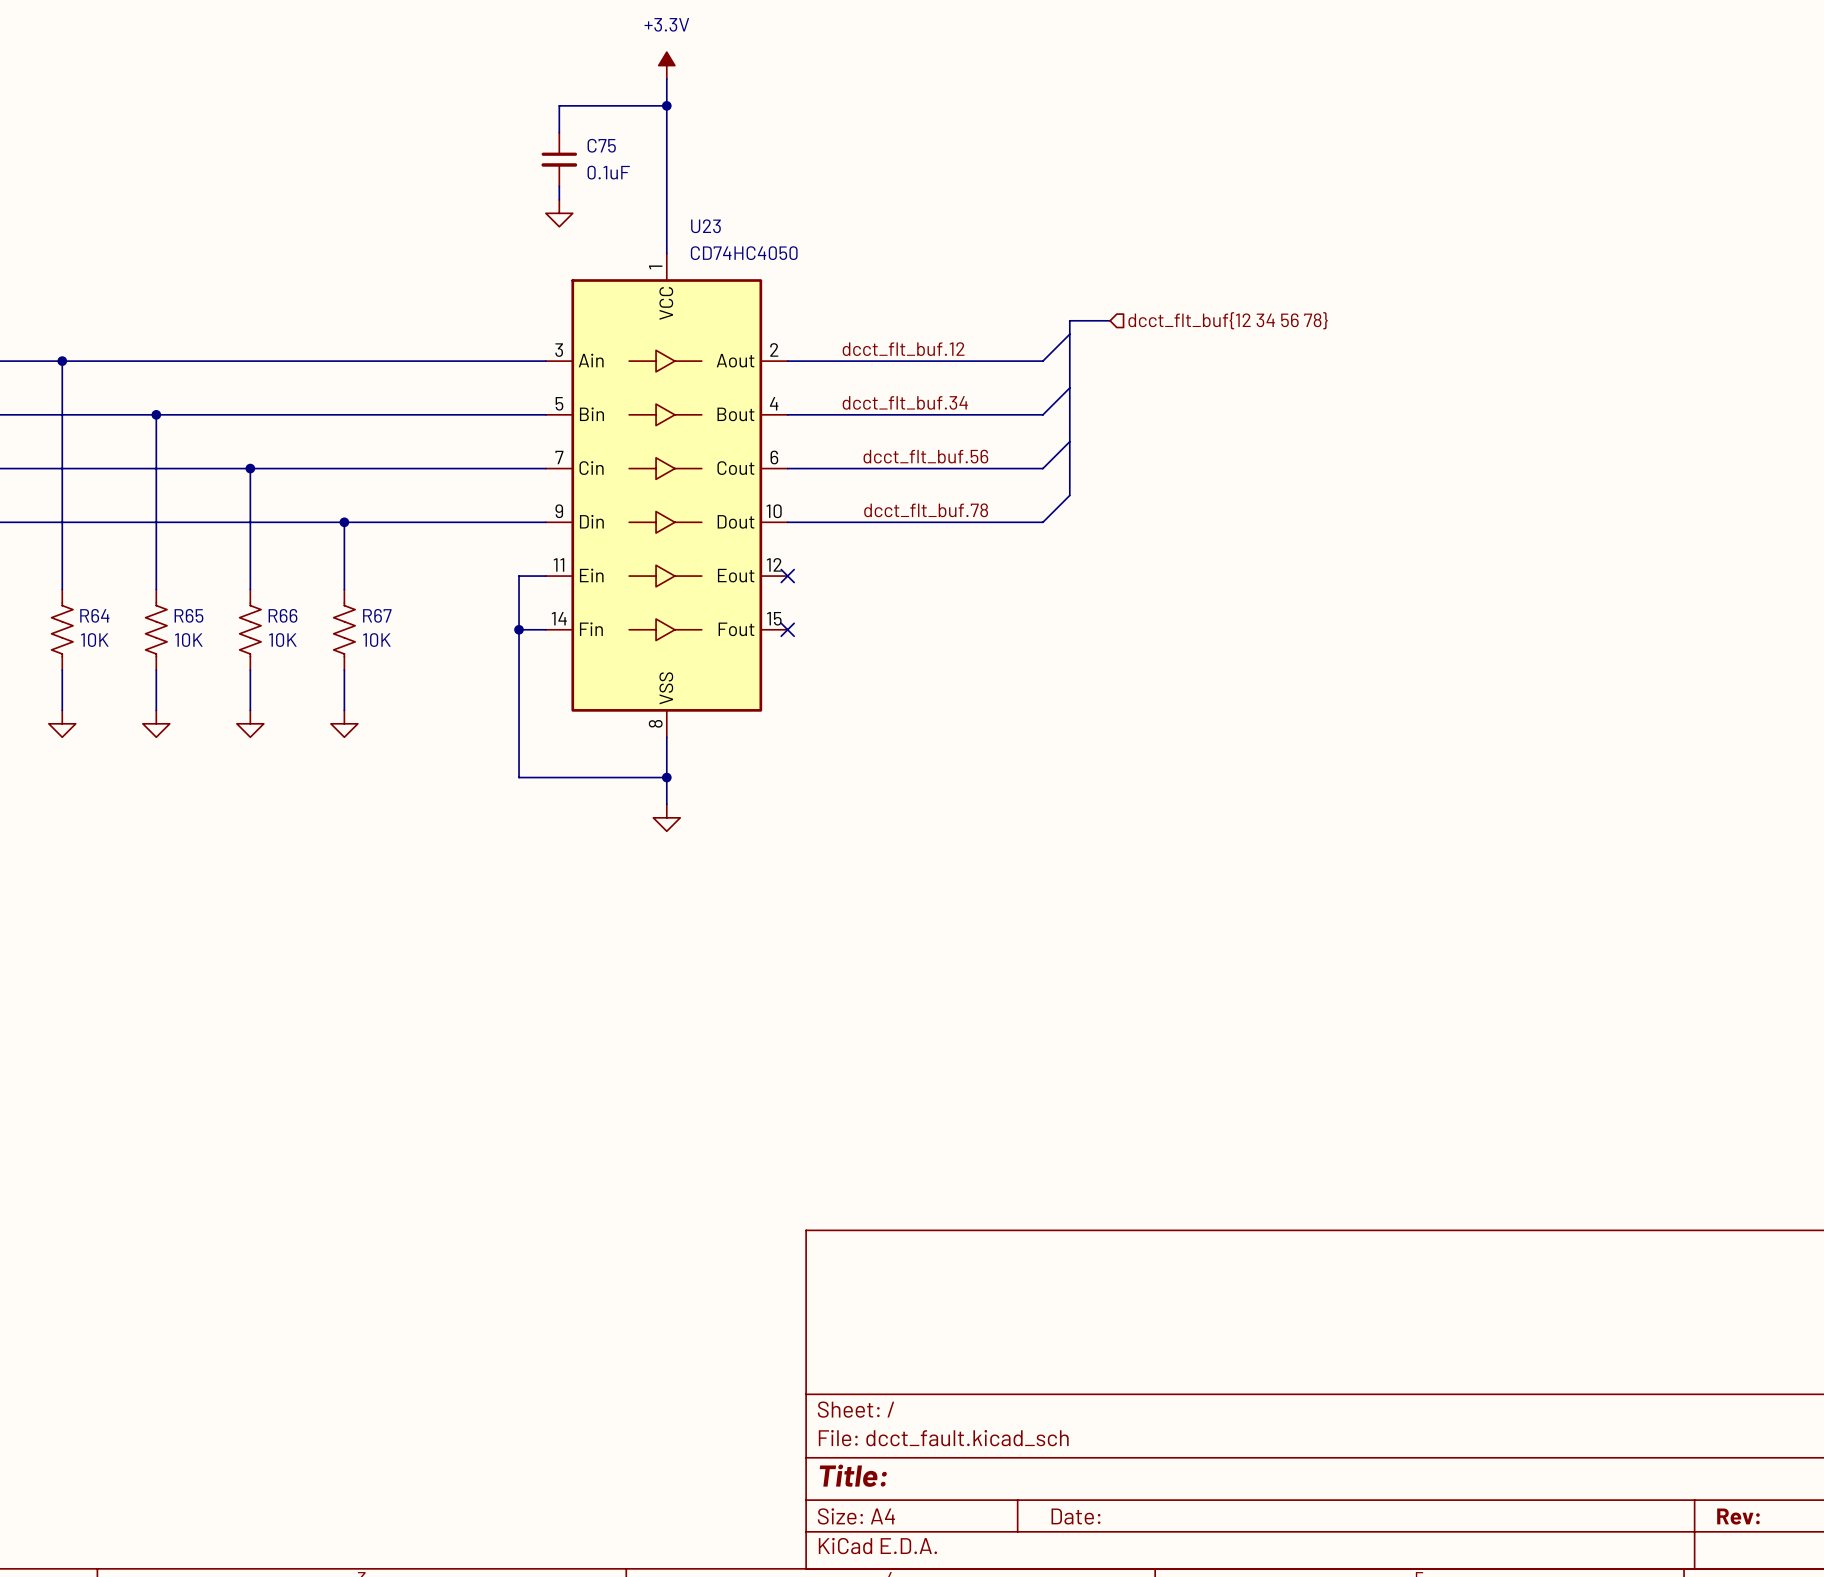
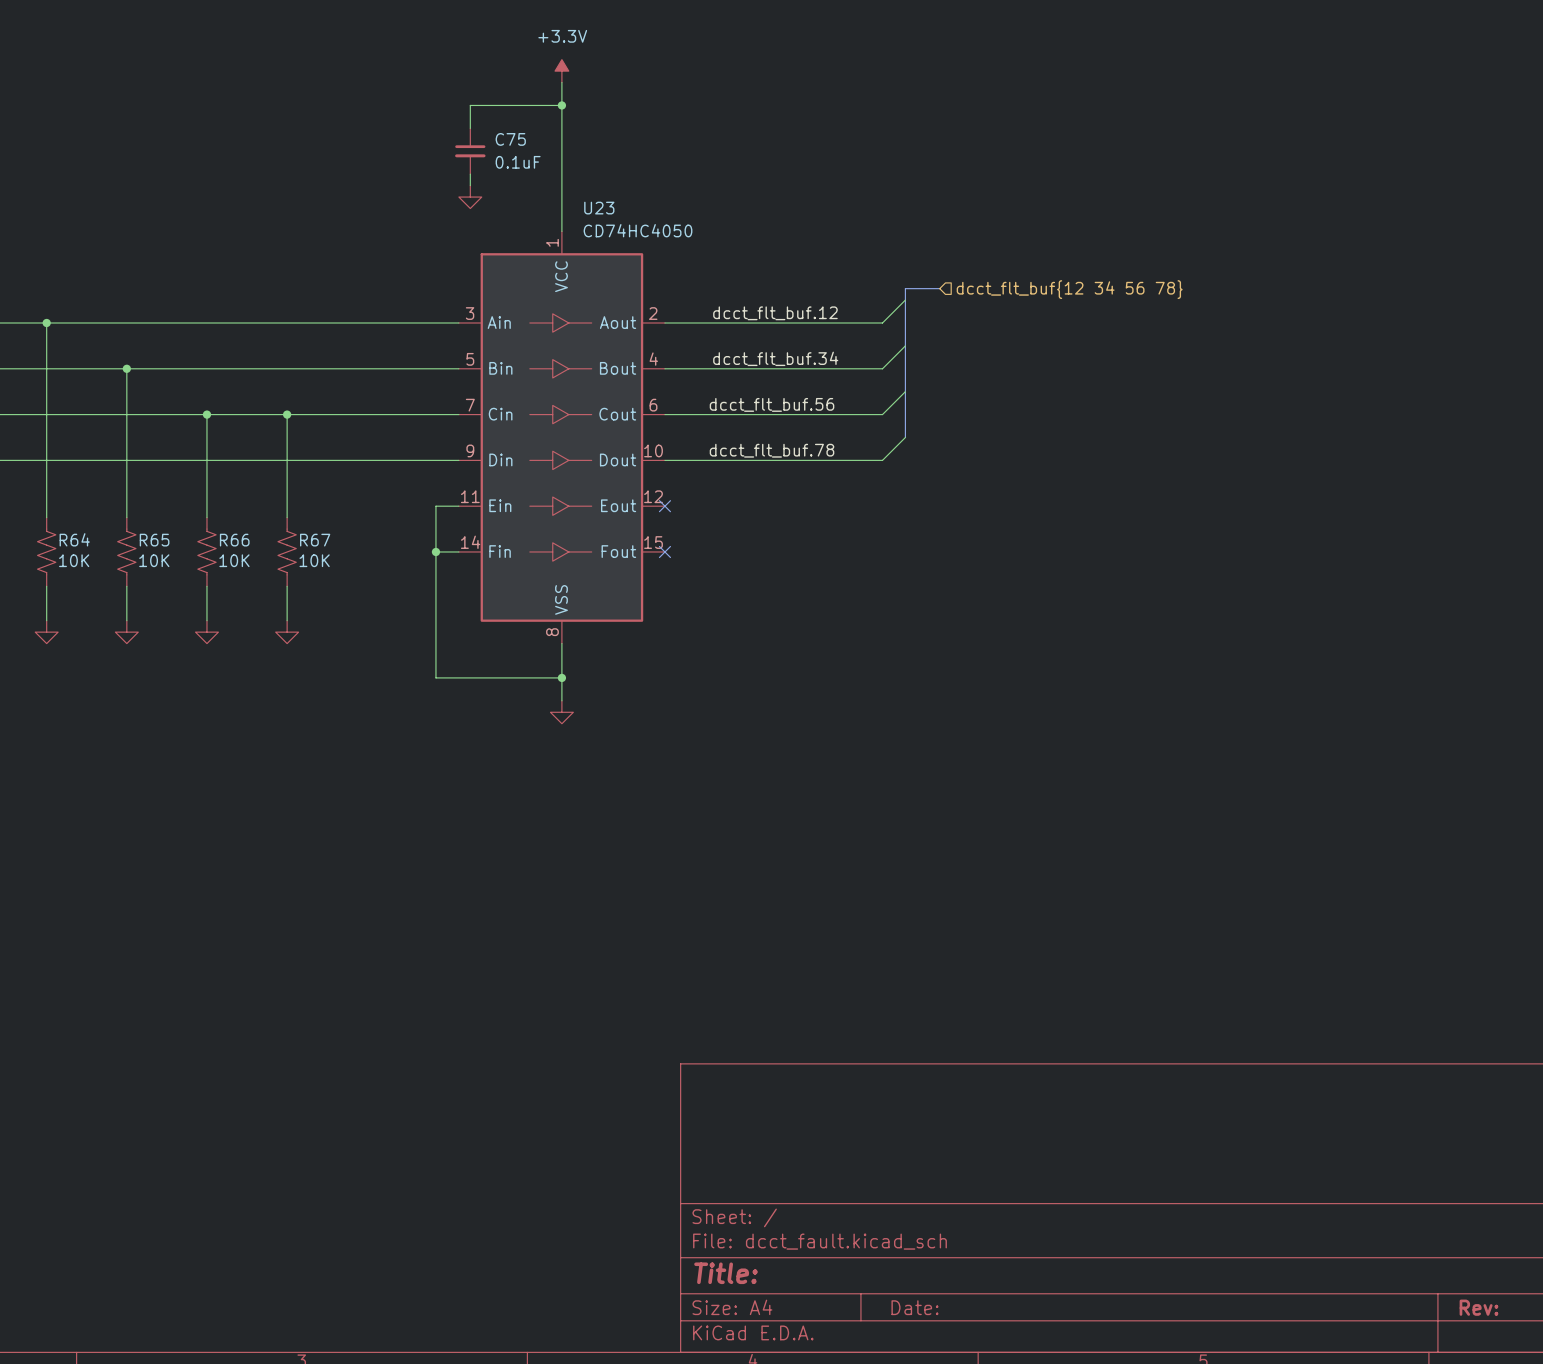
wire: none -> (287, 414) (287, 460)
junction position: (344, 522) -> (287, 414)

